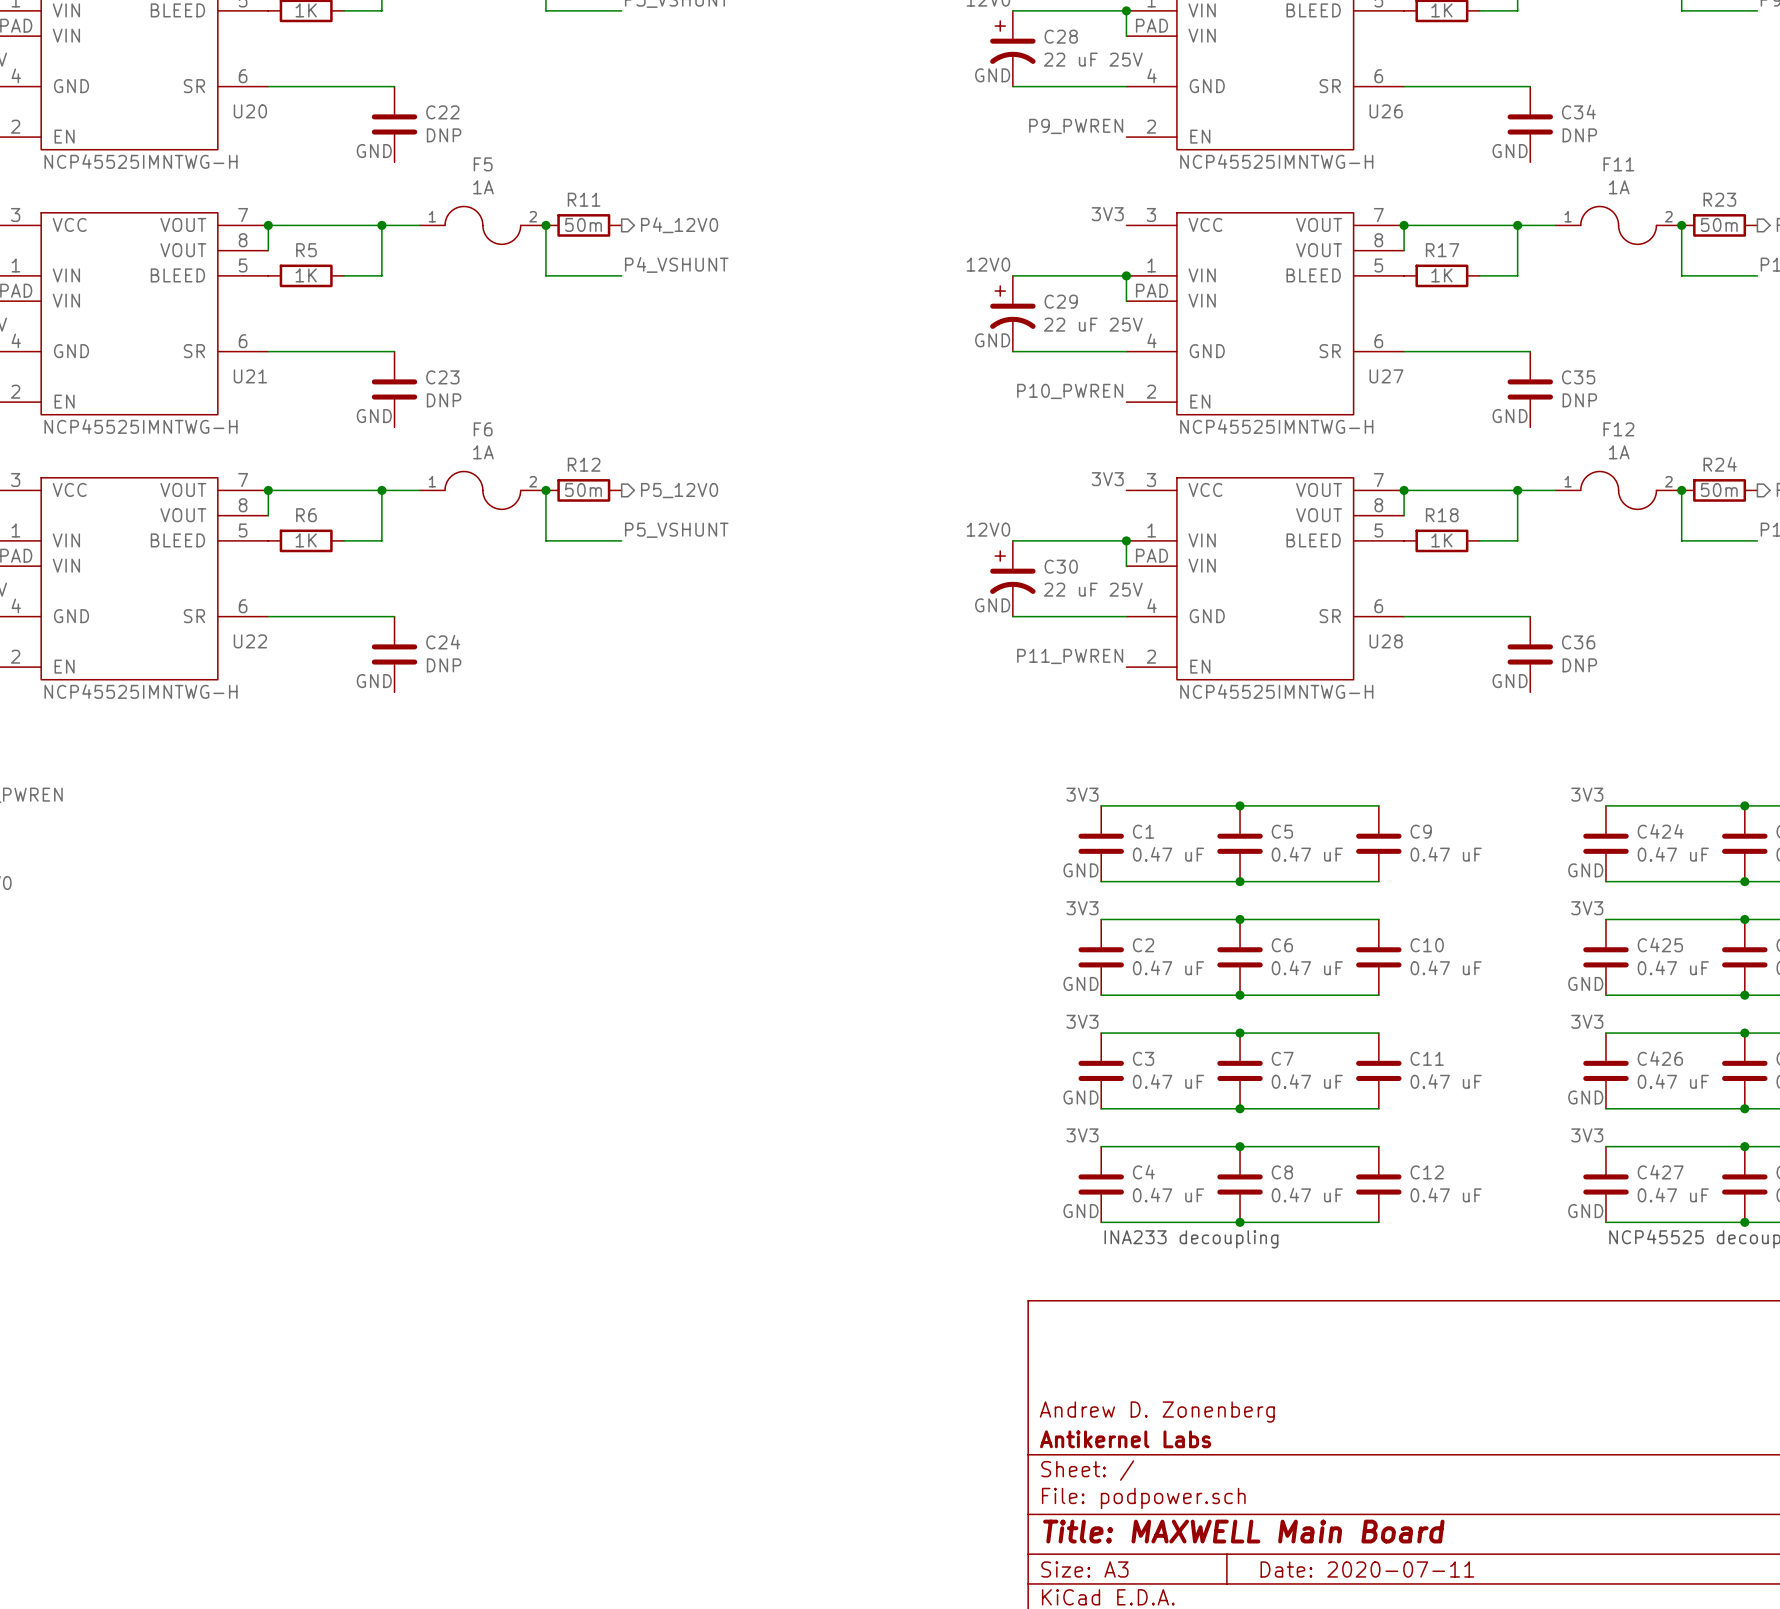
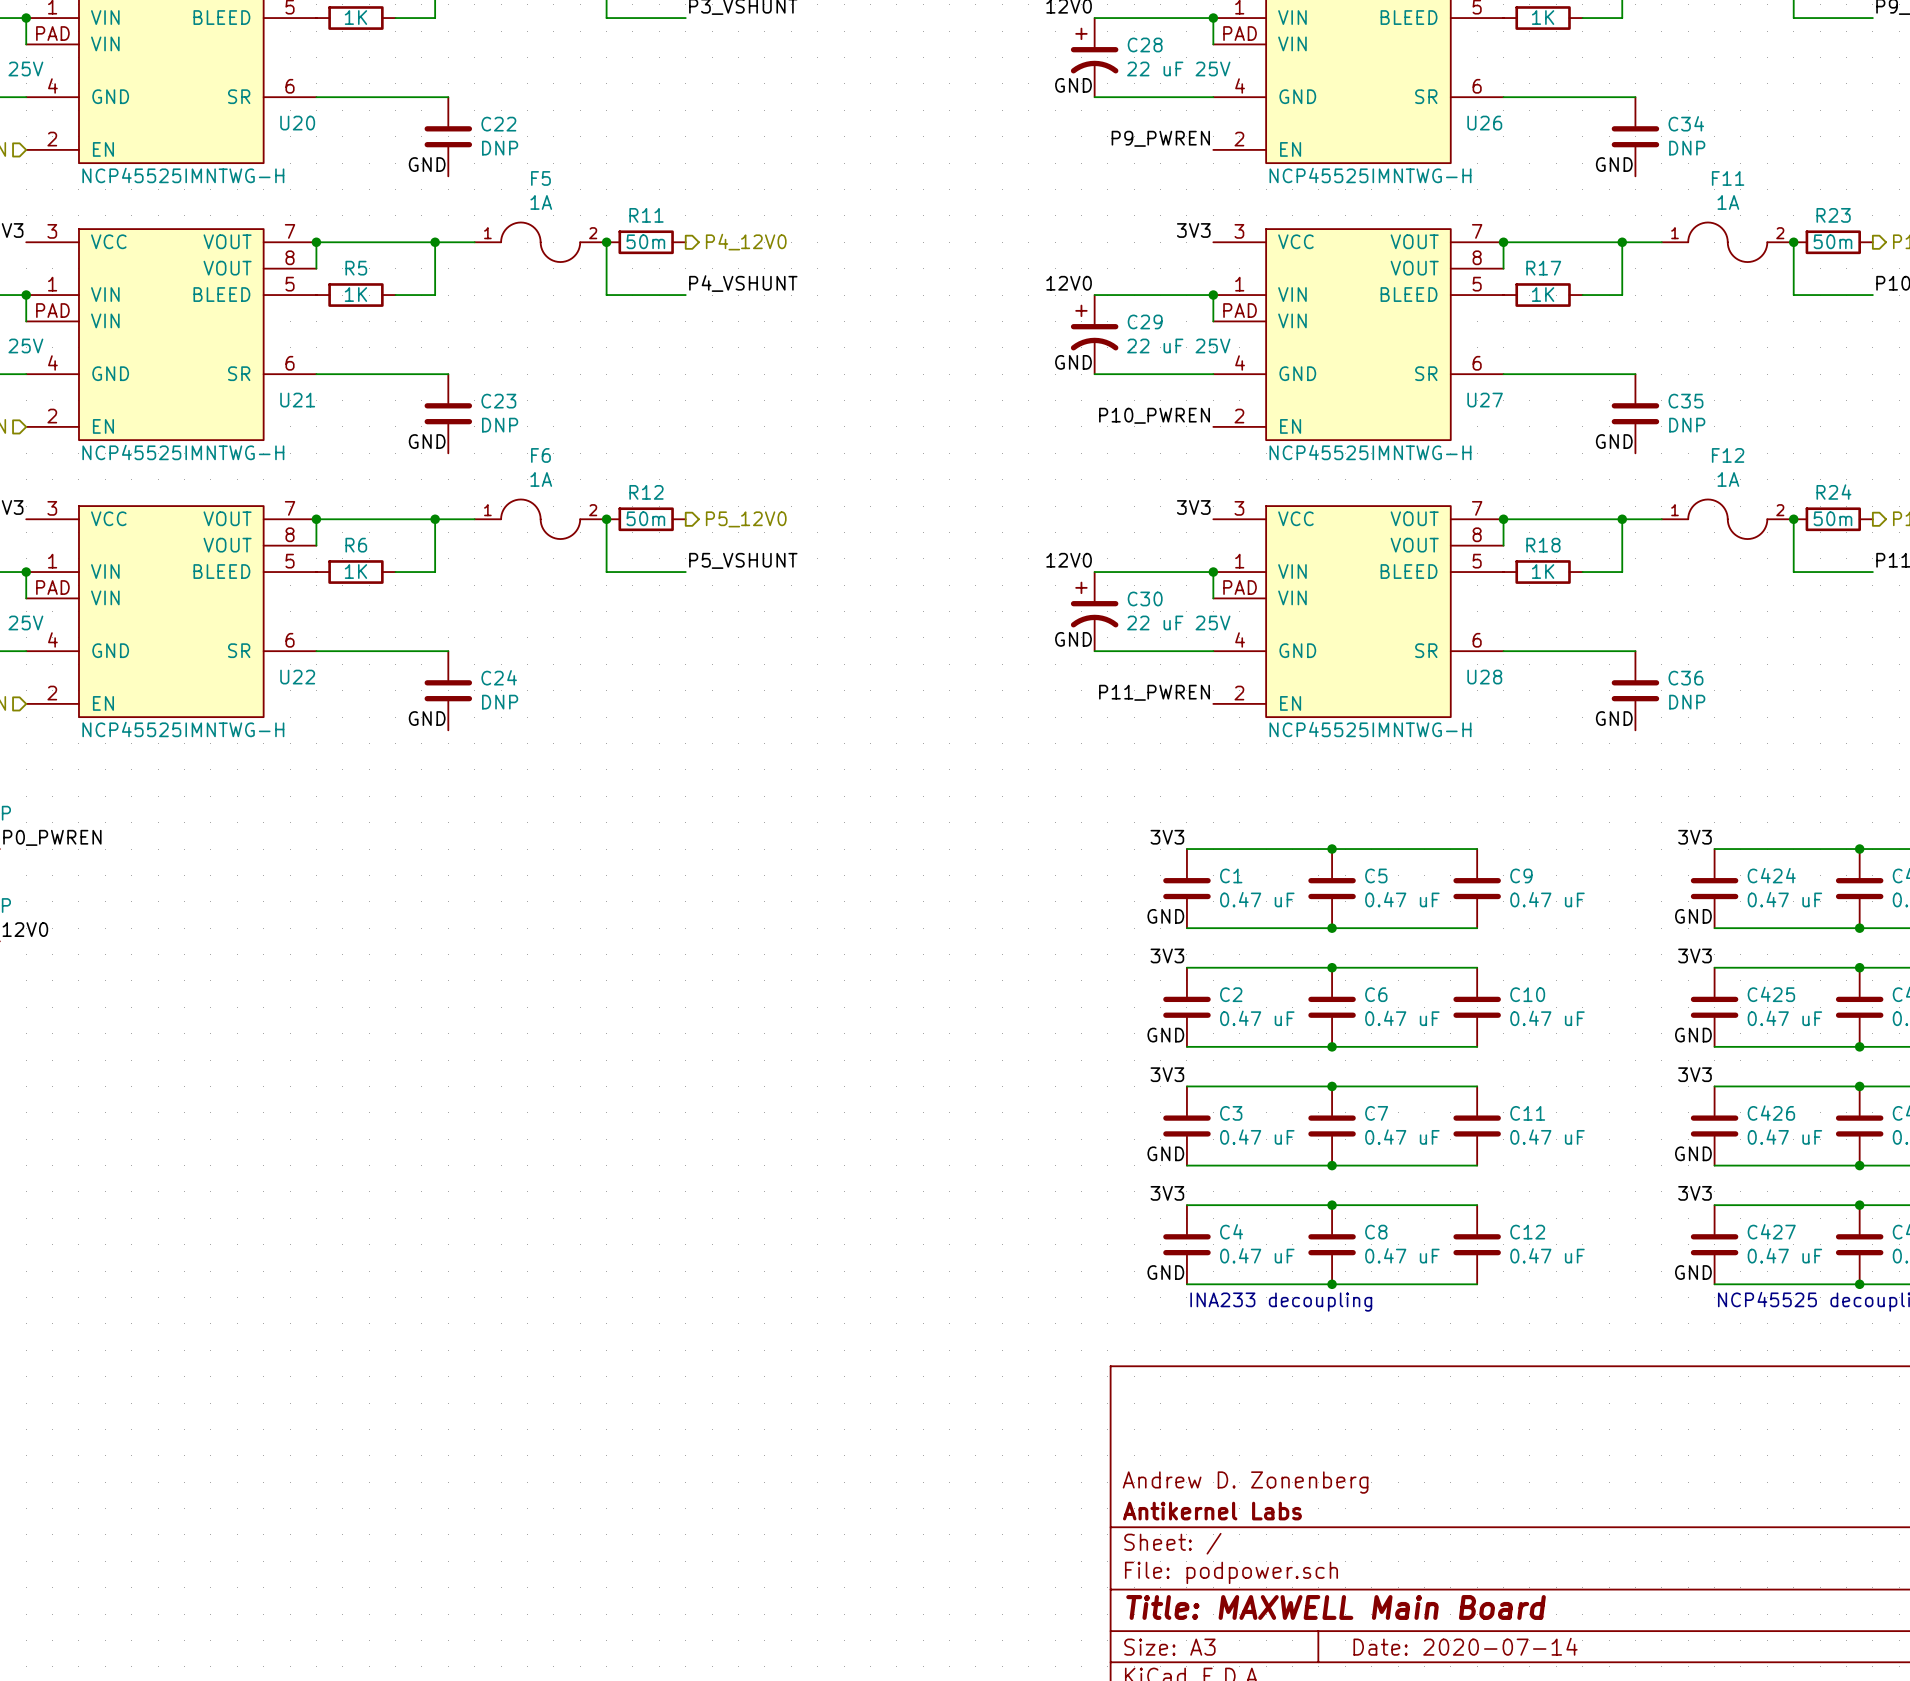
title block: Date: 2020-07-11 (1367, 1569) -> Date: 2020-07-14 (1465, 1646)

